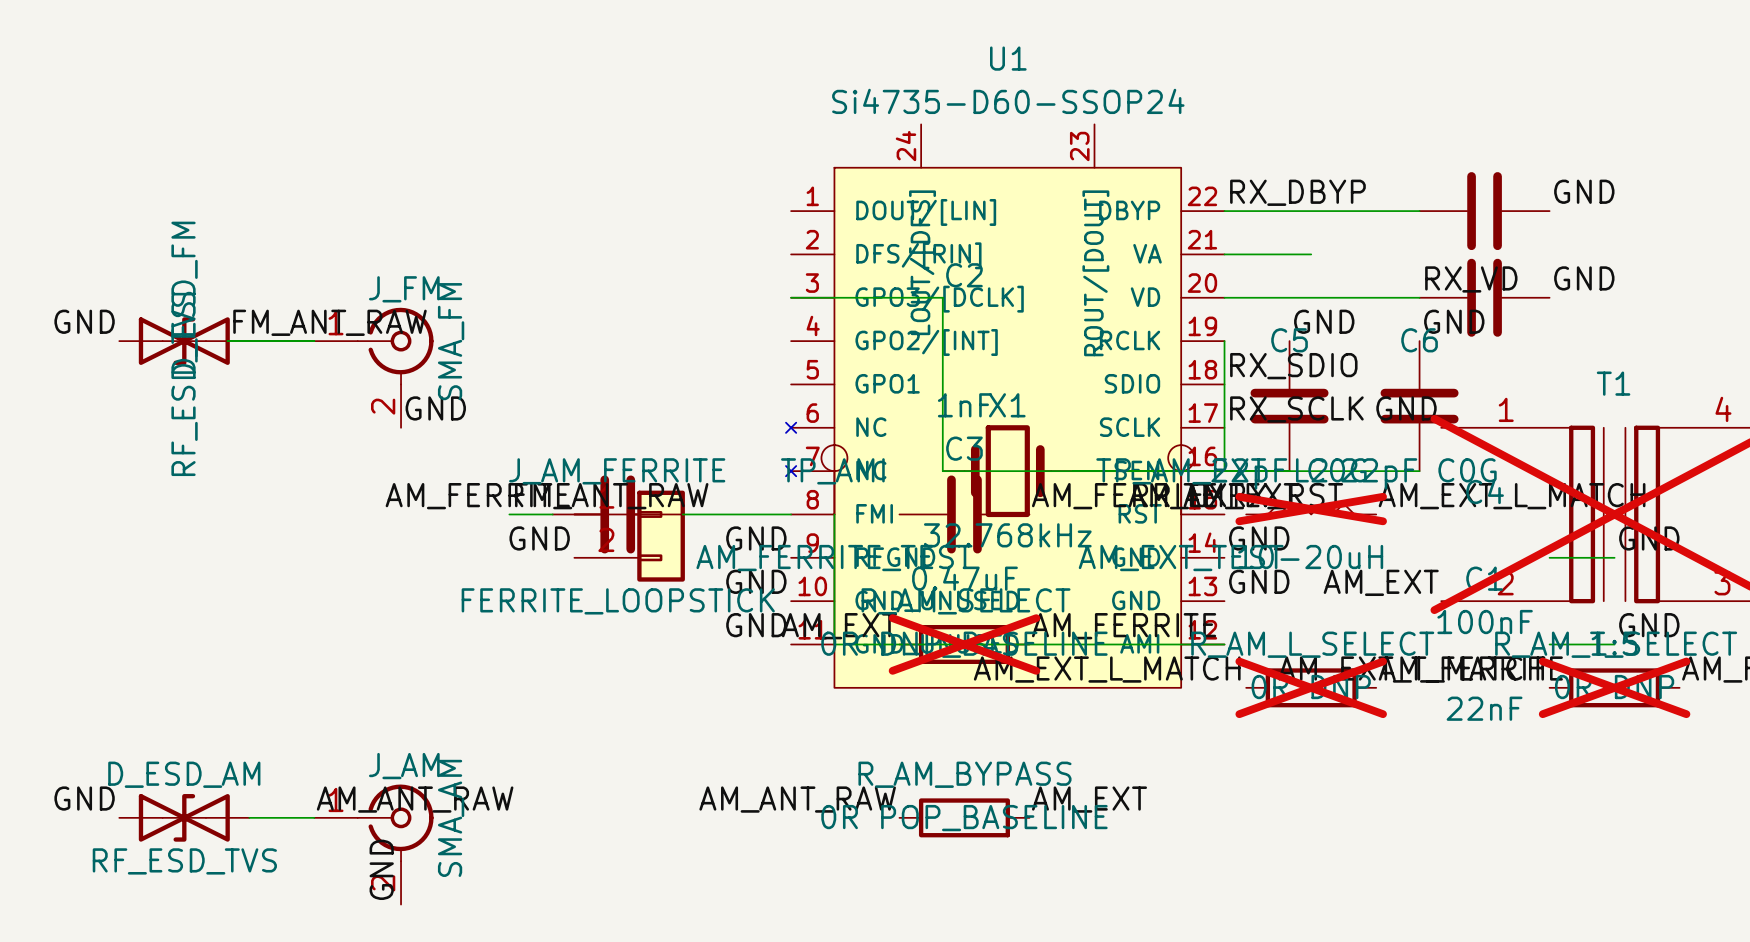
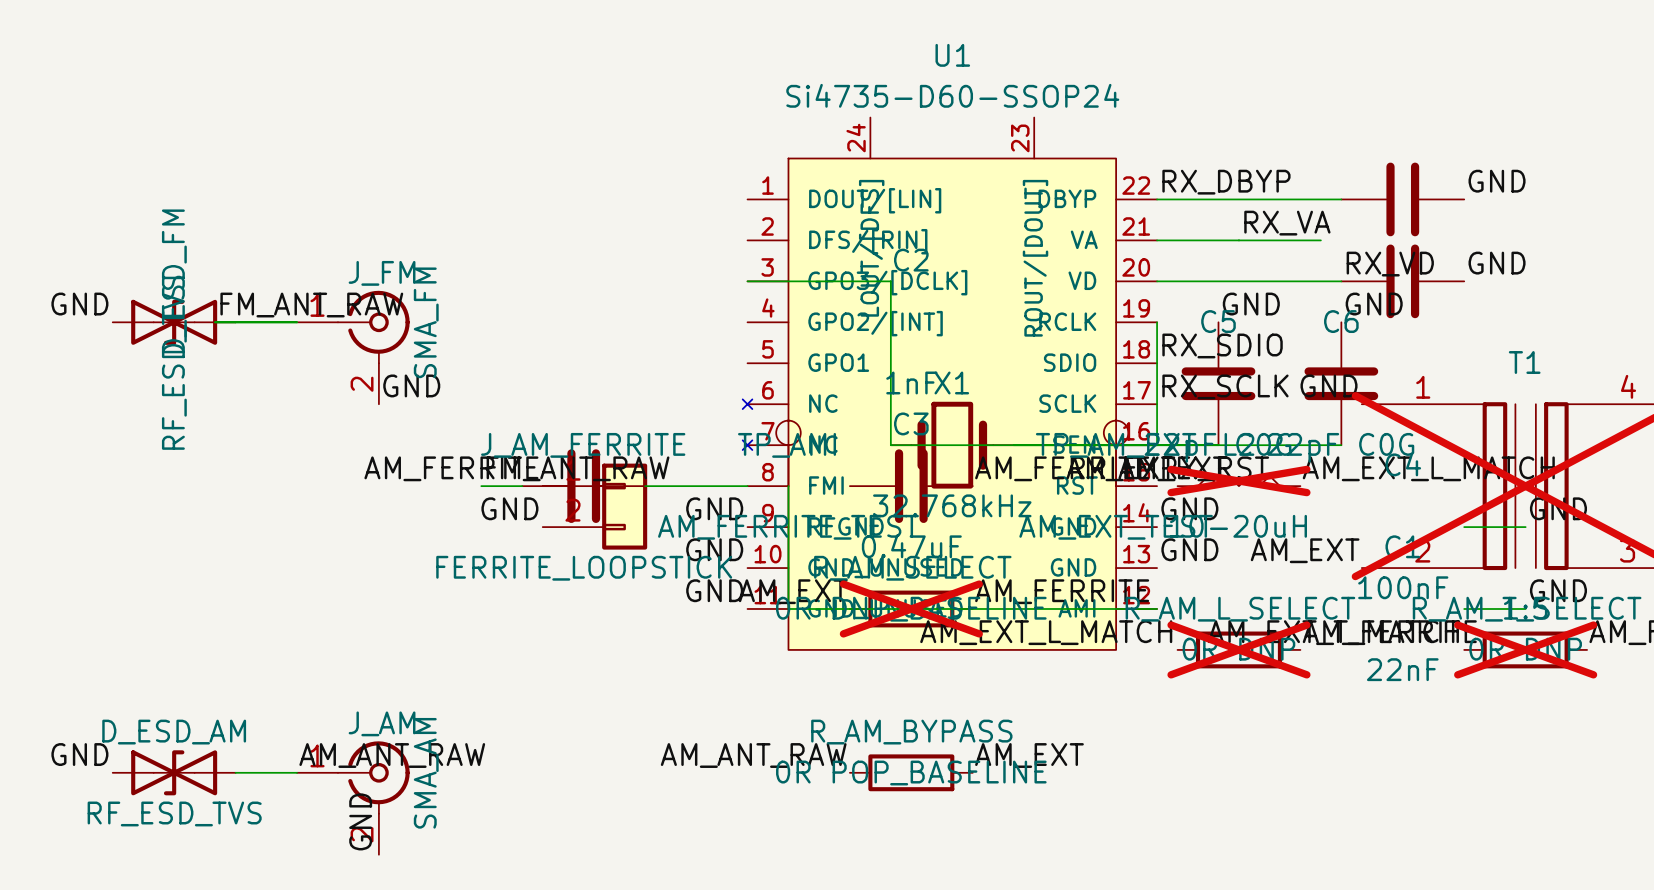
label: none -> RX_VA (1287, 223)
wire: none -> (1238, 240) (1320, 240)

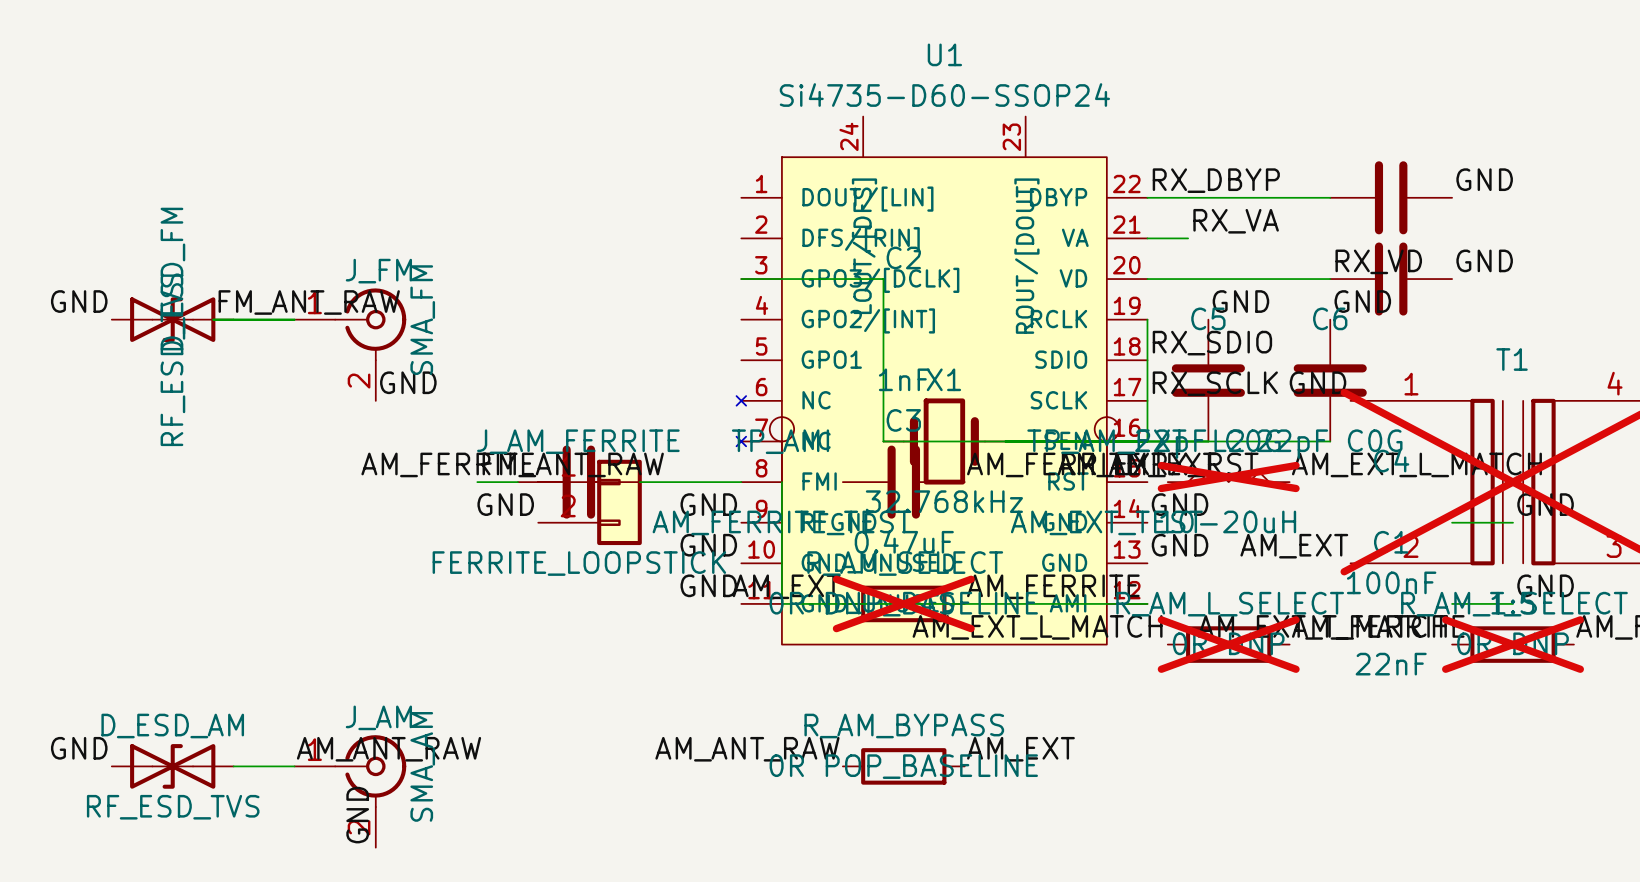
label position: RX_VA (1287, 223) -> RX_VA (1236, 221)
wire: (1198, 240) (1320, 240) -> none

